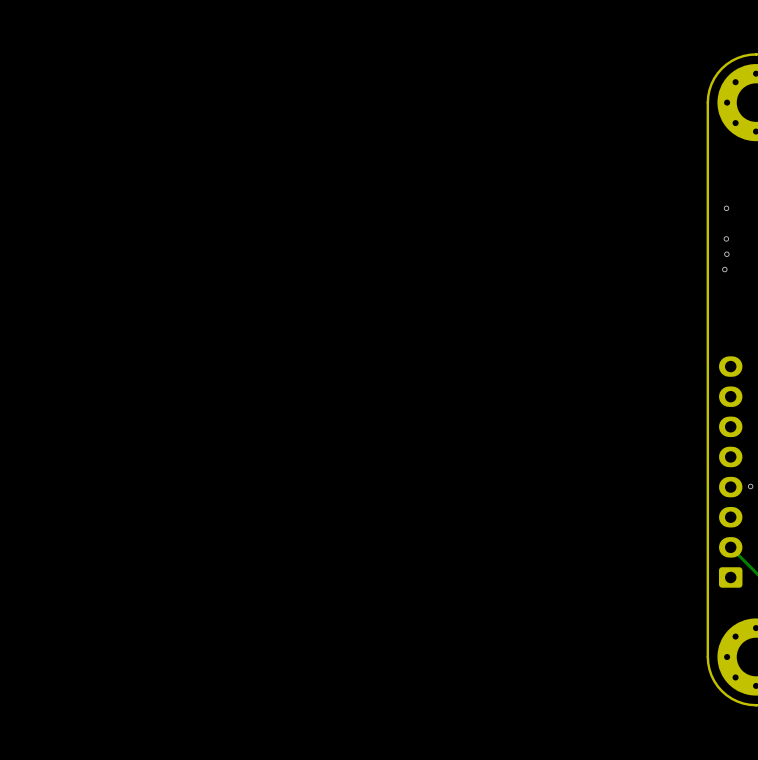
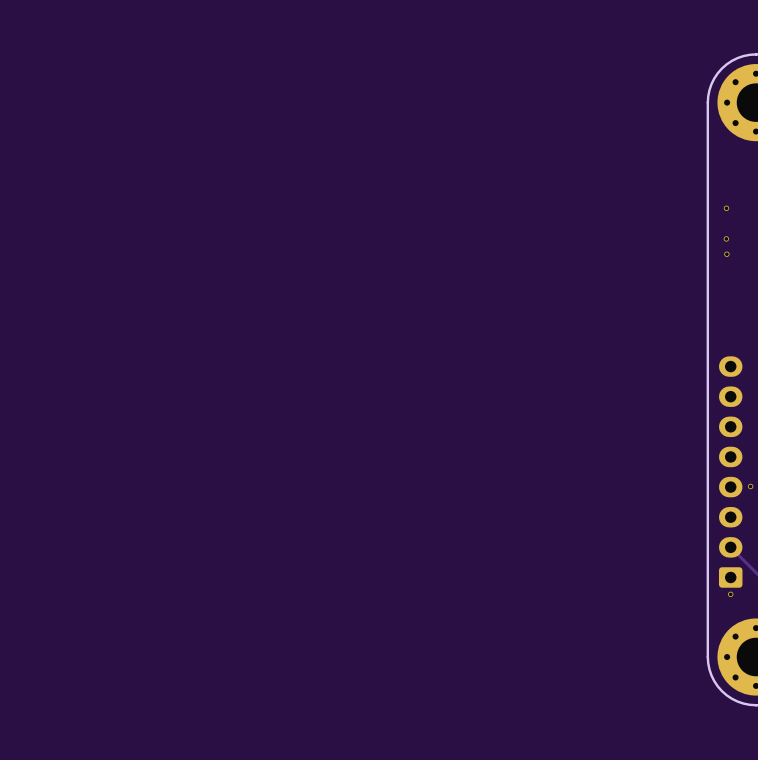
via: (724, 269) -> none
via: none -> (730, 594)

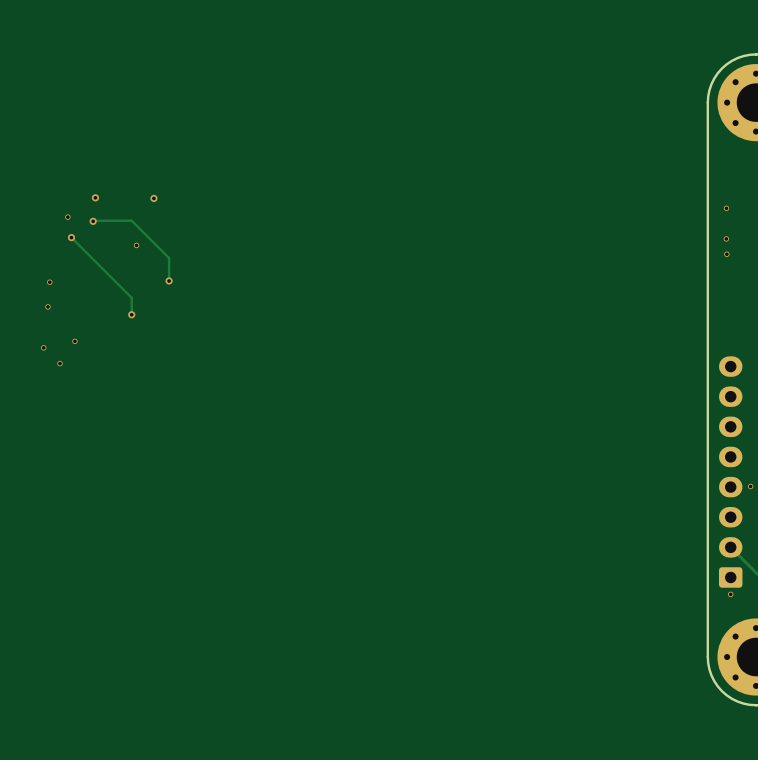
via: none -> (95, 197)
via: none -> (153, 198)
via: none -> (67, 217)
track: none -> (93, 221) (131, 220) (169, 258) (169, 280)
via: none -> (93, 221)
track: none -> (71, 237) (131, 297) (131, 314)
via: none -> (71, 237)
via: none -> (136, 245)
via: none -> (169, 280)
via: none -> (49, 282)
via: none -> (47, 306)
via: none -> (131, 314)
via: none -> (74, 341)
via: none -> (43, 347)
via: none -> (60, 363)

